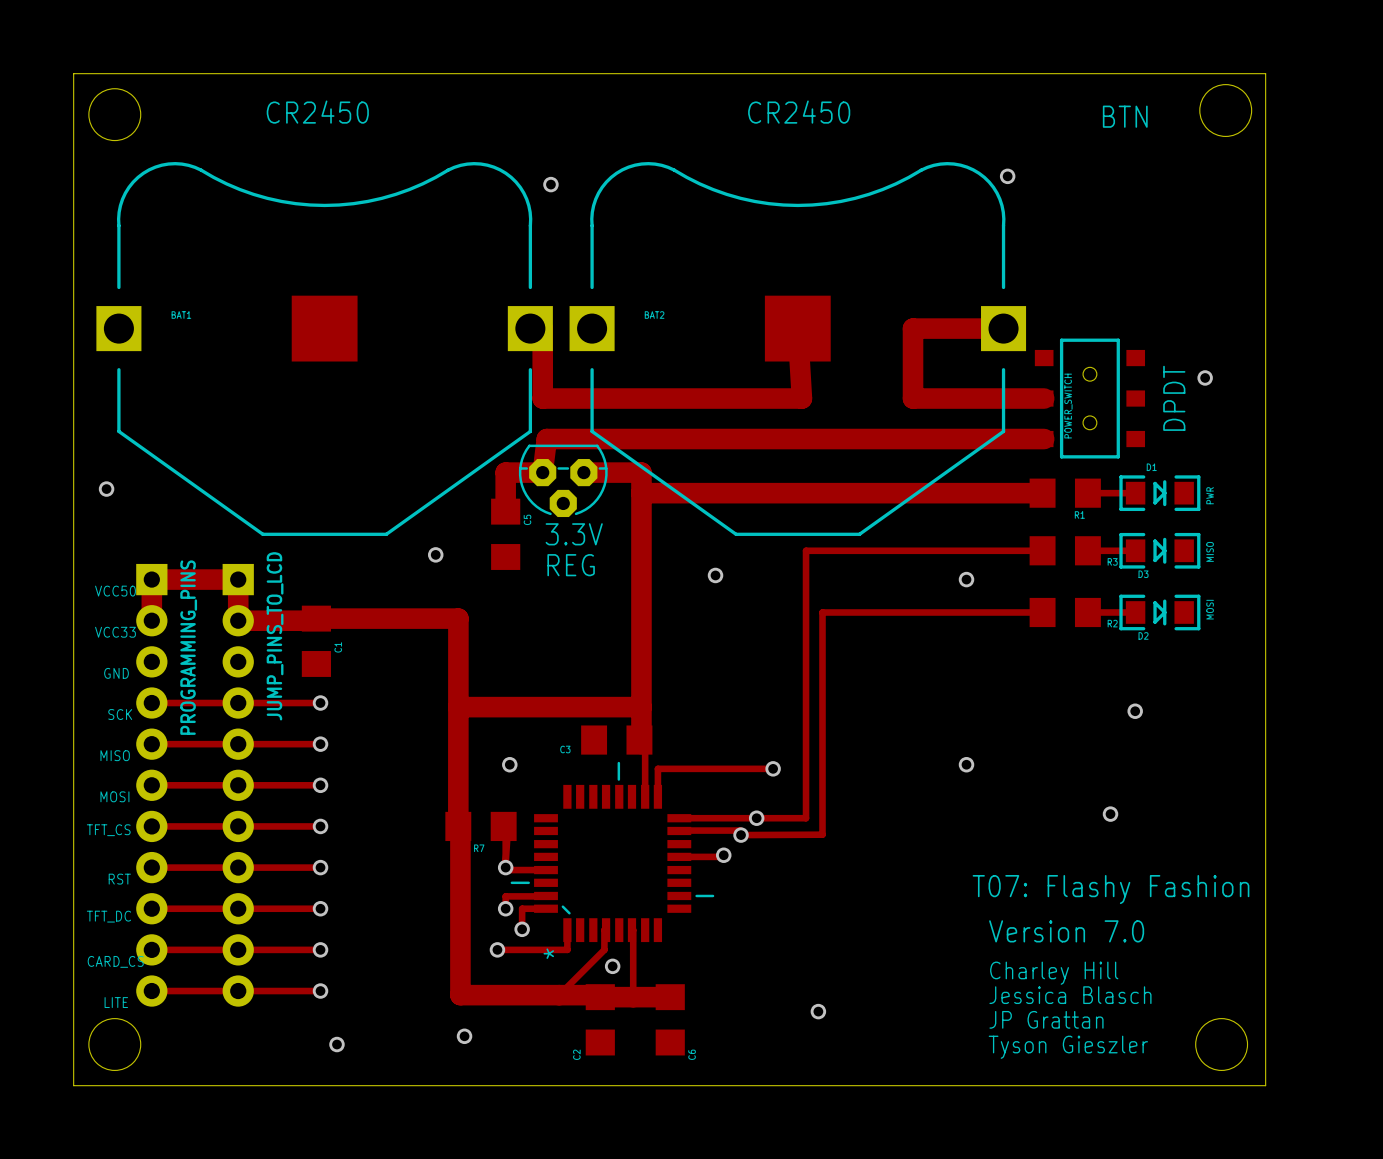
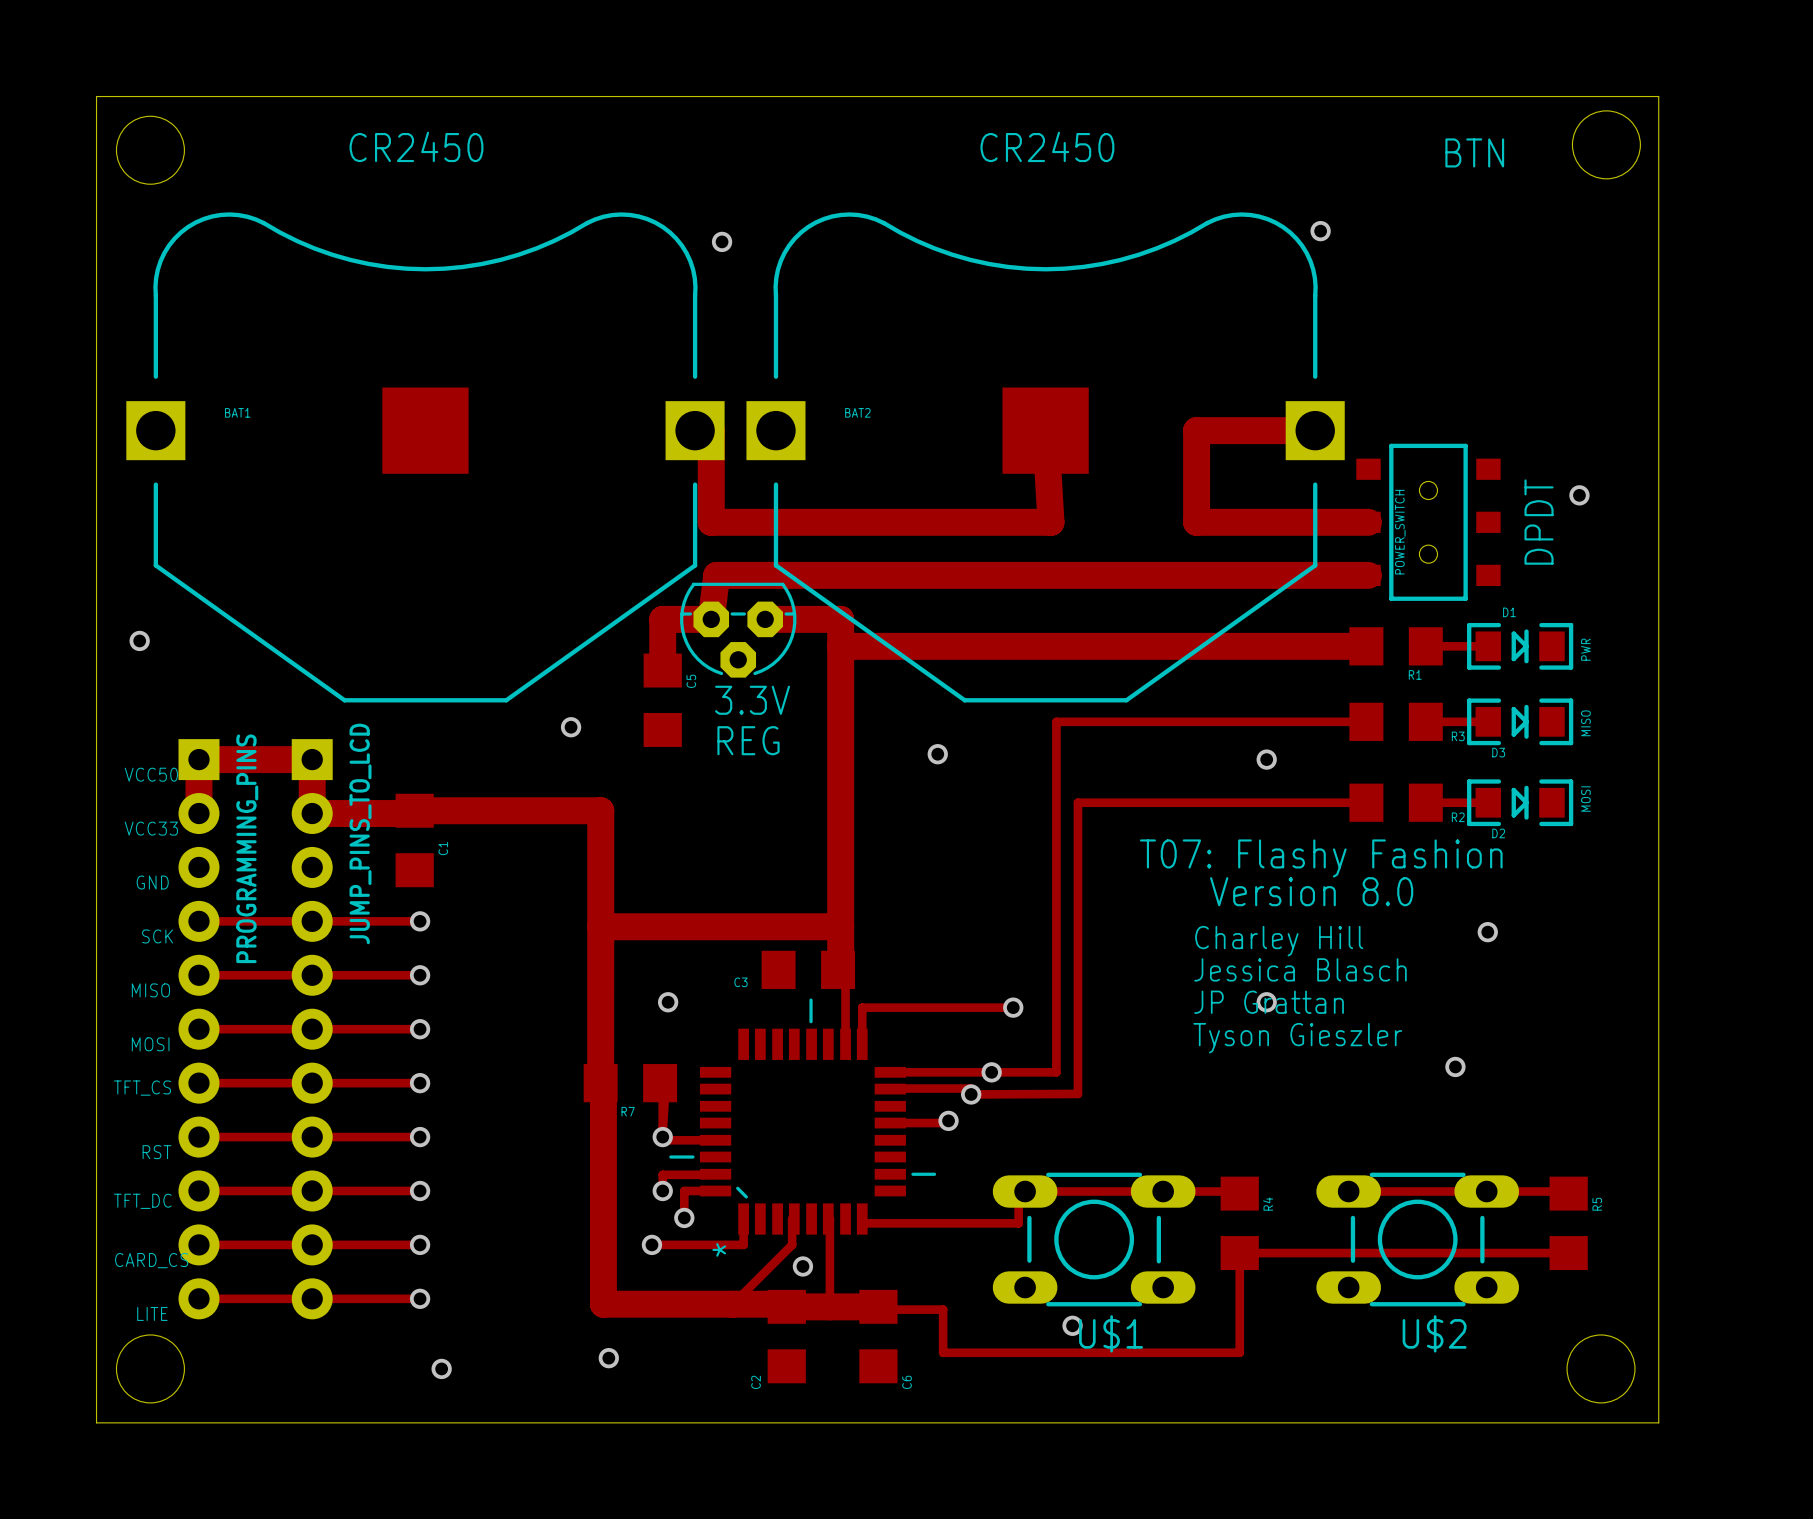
text: none -> Version 8.0 (1311, 891)
text position: T07: Flashy Fashion (1111, 889) -> T07: Flashy Fashion (1321, 858)
track: none -> (1348, 1191) (1348, 1180) (1342, 1180) (1342, 1191) (1568, 1191) (1568, 1193)
track: none -> (1239, 1193) (1239, 1191) (1018, 1191) (1018, 1223) (862, 1223) (862, 1219)
text: Version 7.0 (1066, 931) -> none
R4: none -> (1239, 1223)
R5: none -> (1568, 1223)
U$1: none -> (1094, 1239)
U$2: none -> (1417, 1239)
track: none -> (1568, 1253) (1239, 1253) (1239, 1352) (943, 1352) (943, 1309) (878, 1309) (878, 1306)
text position: Charley Hill (1054, 973) -> Charley Hill (1279, 941)
text position: Jessica Blasch (1070, 995) -> Jessica Blasch (1300, 969)
text position: JP Grattan (1046, 1019) -> JP Grattan (1269, 1002)
text position: Tyson Gieszler (1068, 1047) -> Tyson Gieszler (1297, 1038)

